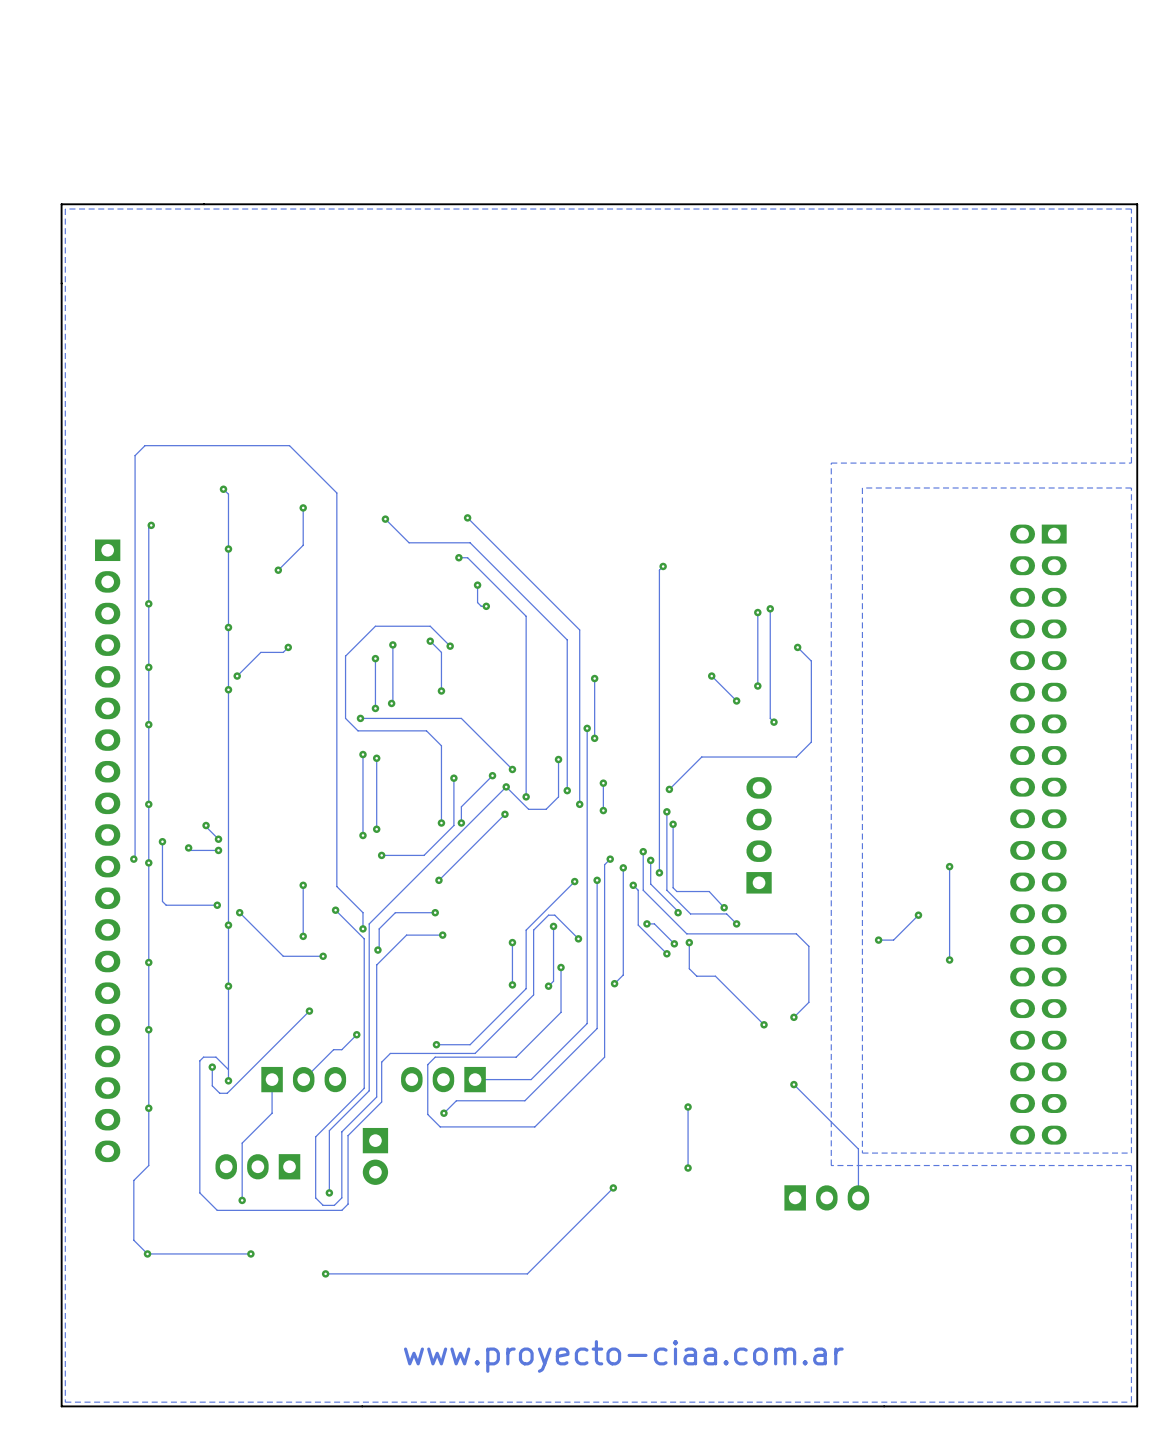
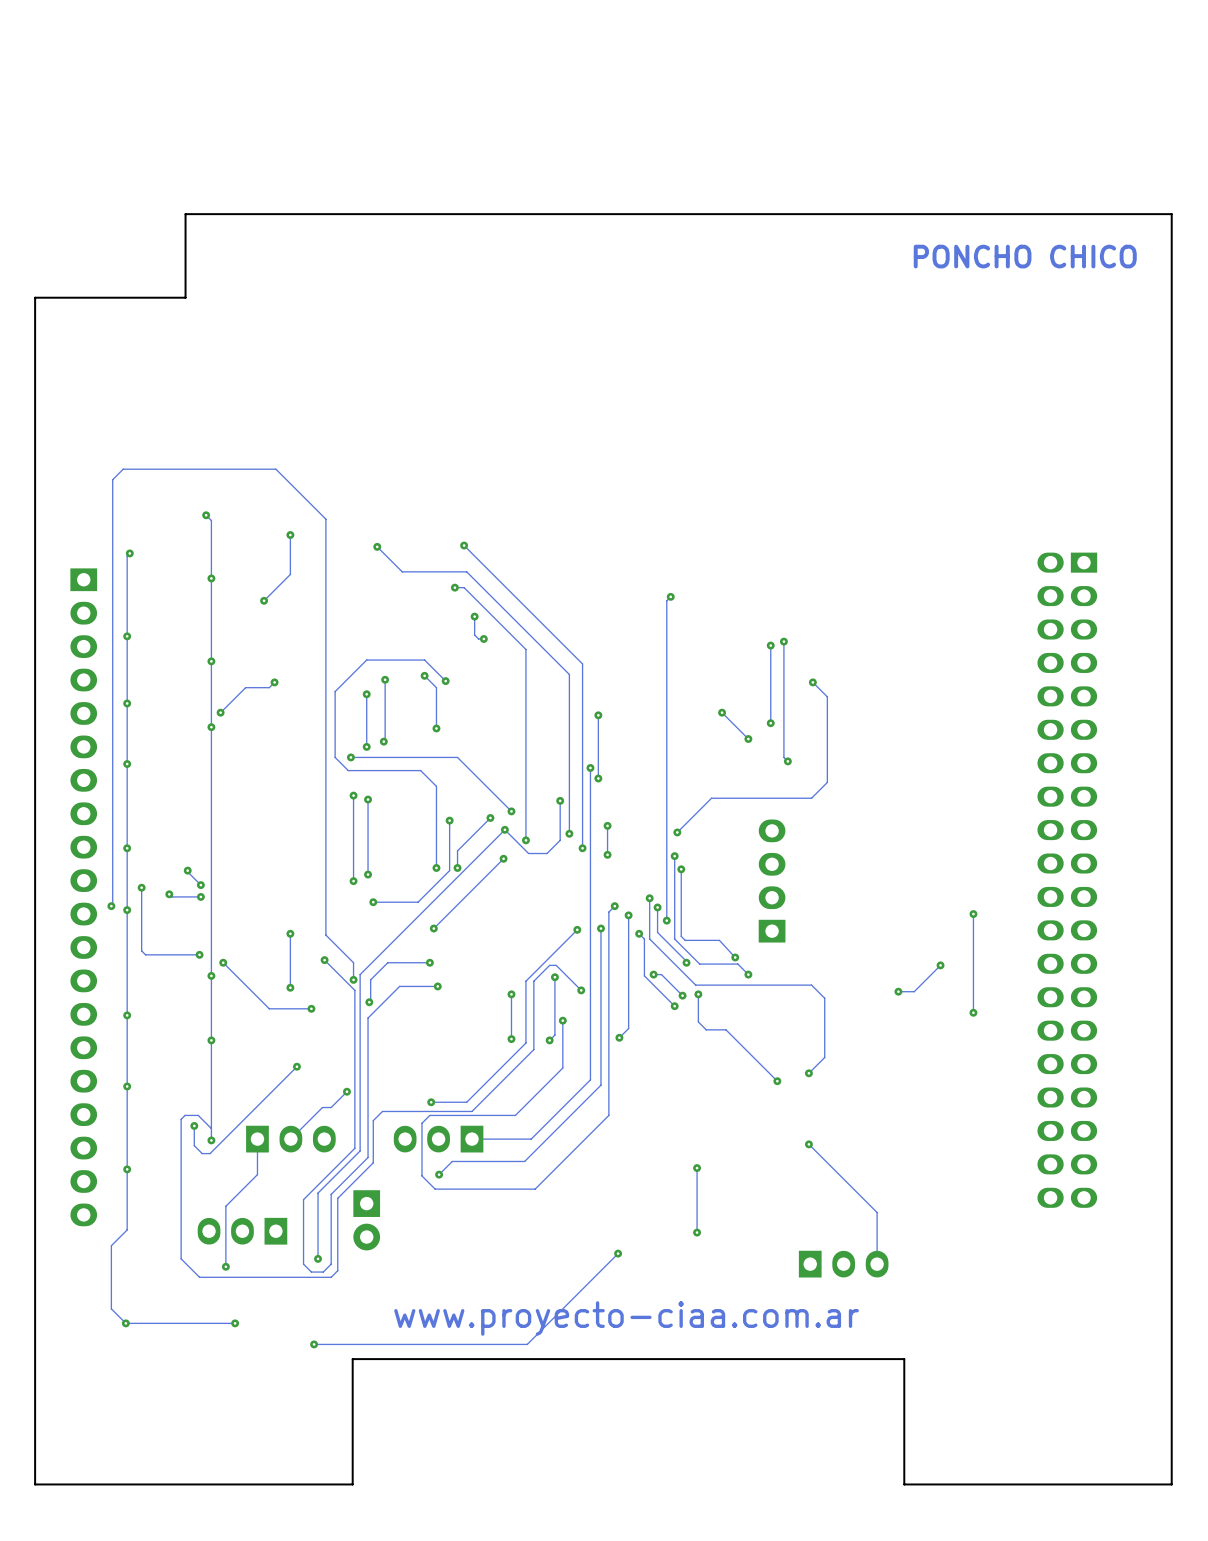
board edge: (204, 204) (61, 204) (61, 283) -> (185, 214) (185, 297) (35, 297)
zone outline: (1131, 209) (1131, 463) (831, 463) (831, 1165) (1131, 1165) (1131, 1402) (65, 1402) (65, 209) (1131, 209) -> none
text: none -> PONCHO CHICO (1025, 256)
zone outline: (1131, 487) (1131, 1153) (862, 1153) (862, 487) (1131, 487) -> none
text position: www.proyecto-ciaa.com.ar (623, 1356) -> www.proyecto-ciaa.com.ar (626, 1318)
board edge: (884, 1406) (362, 1406) -> (904, 1484) (904, 1359) (352, 1359) (352, 1484)

